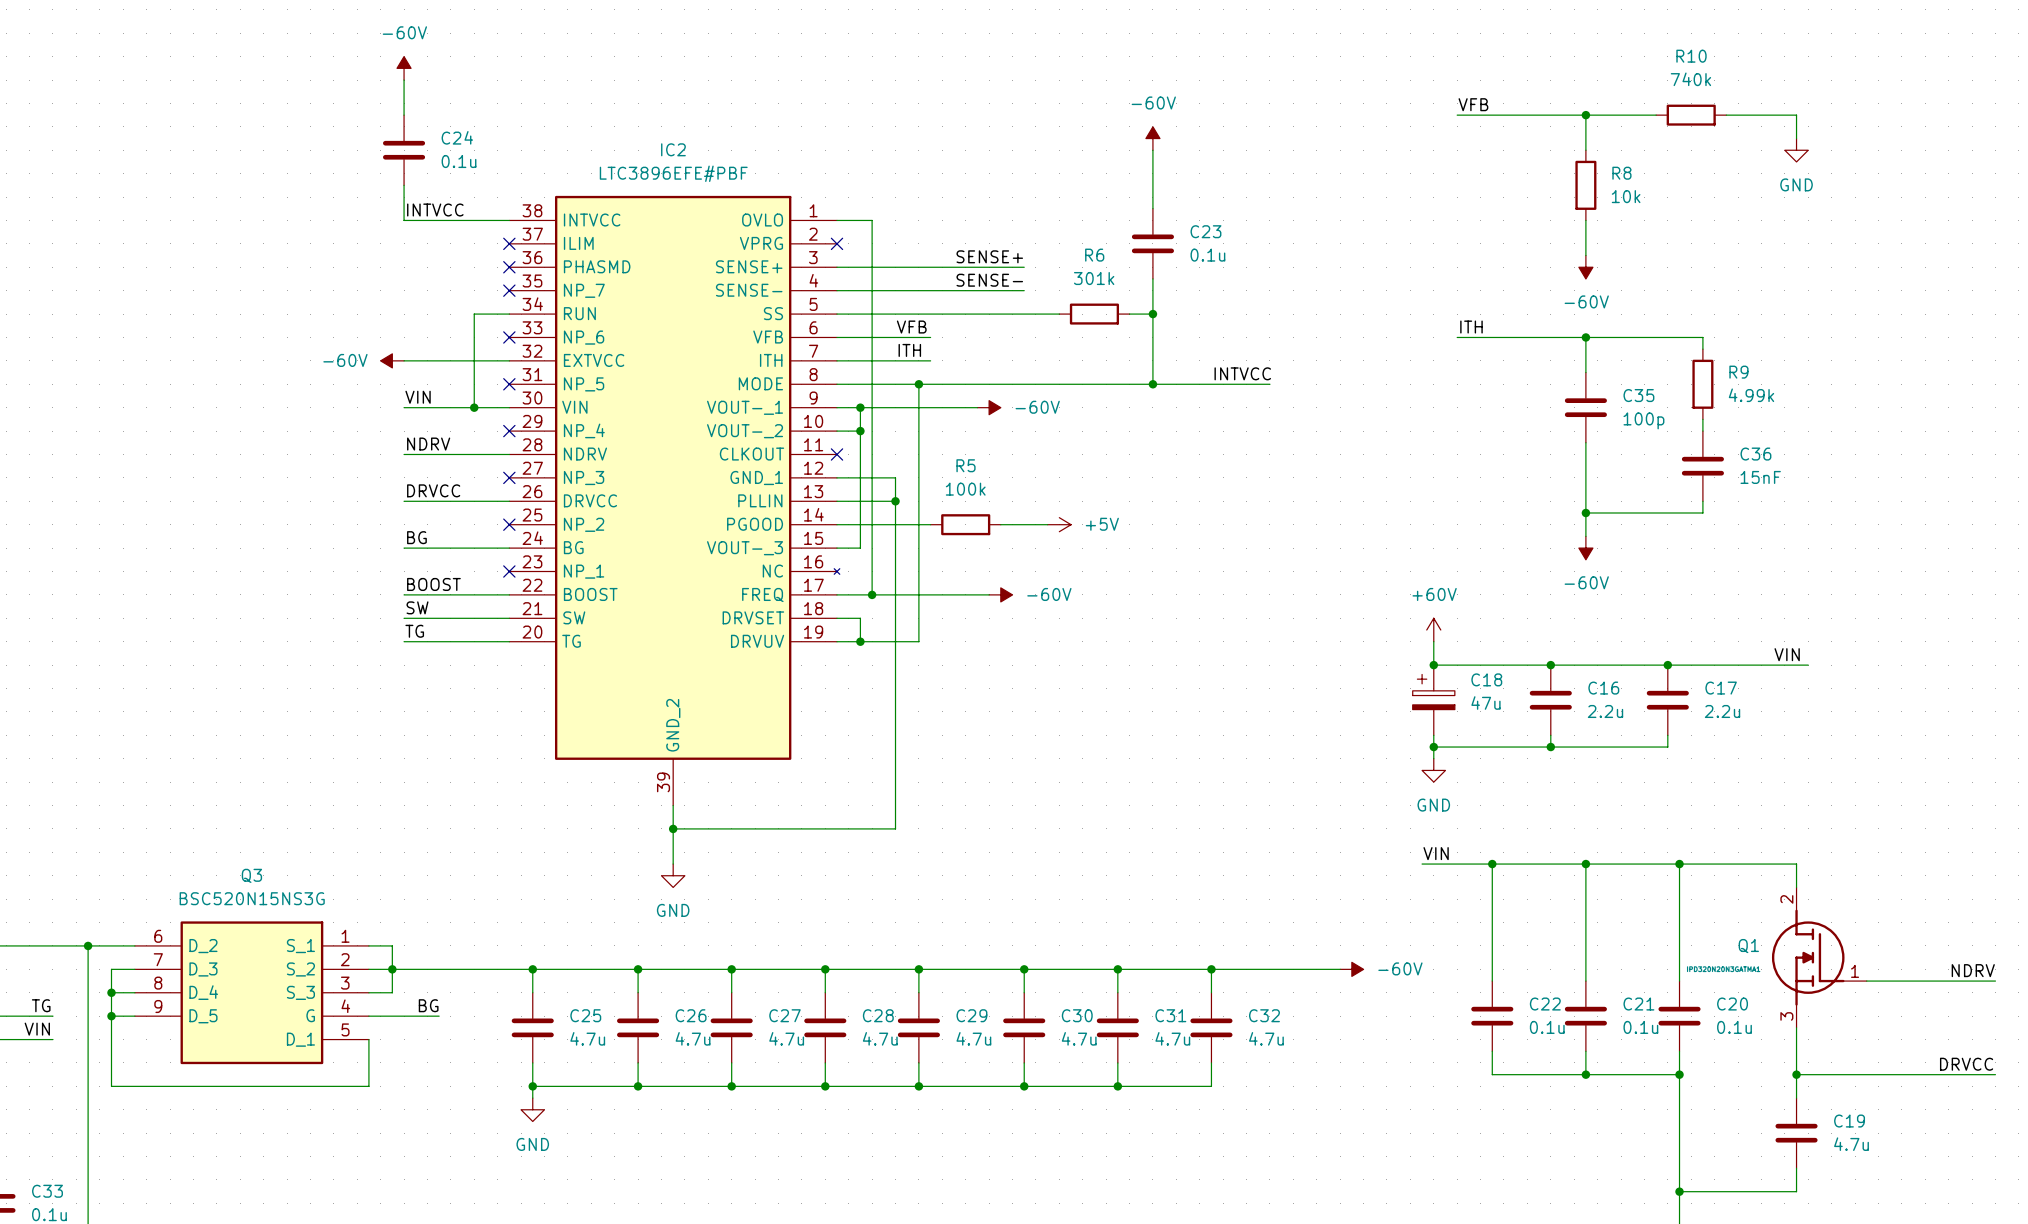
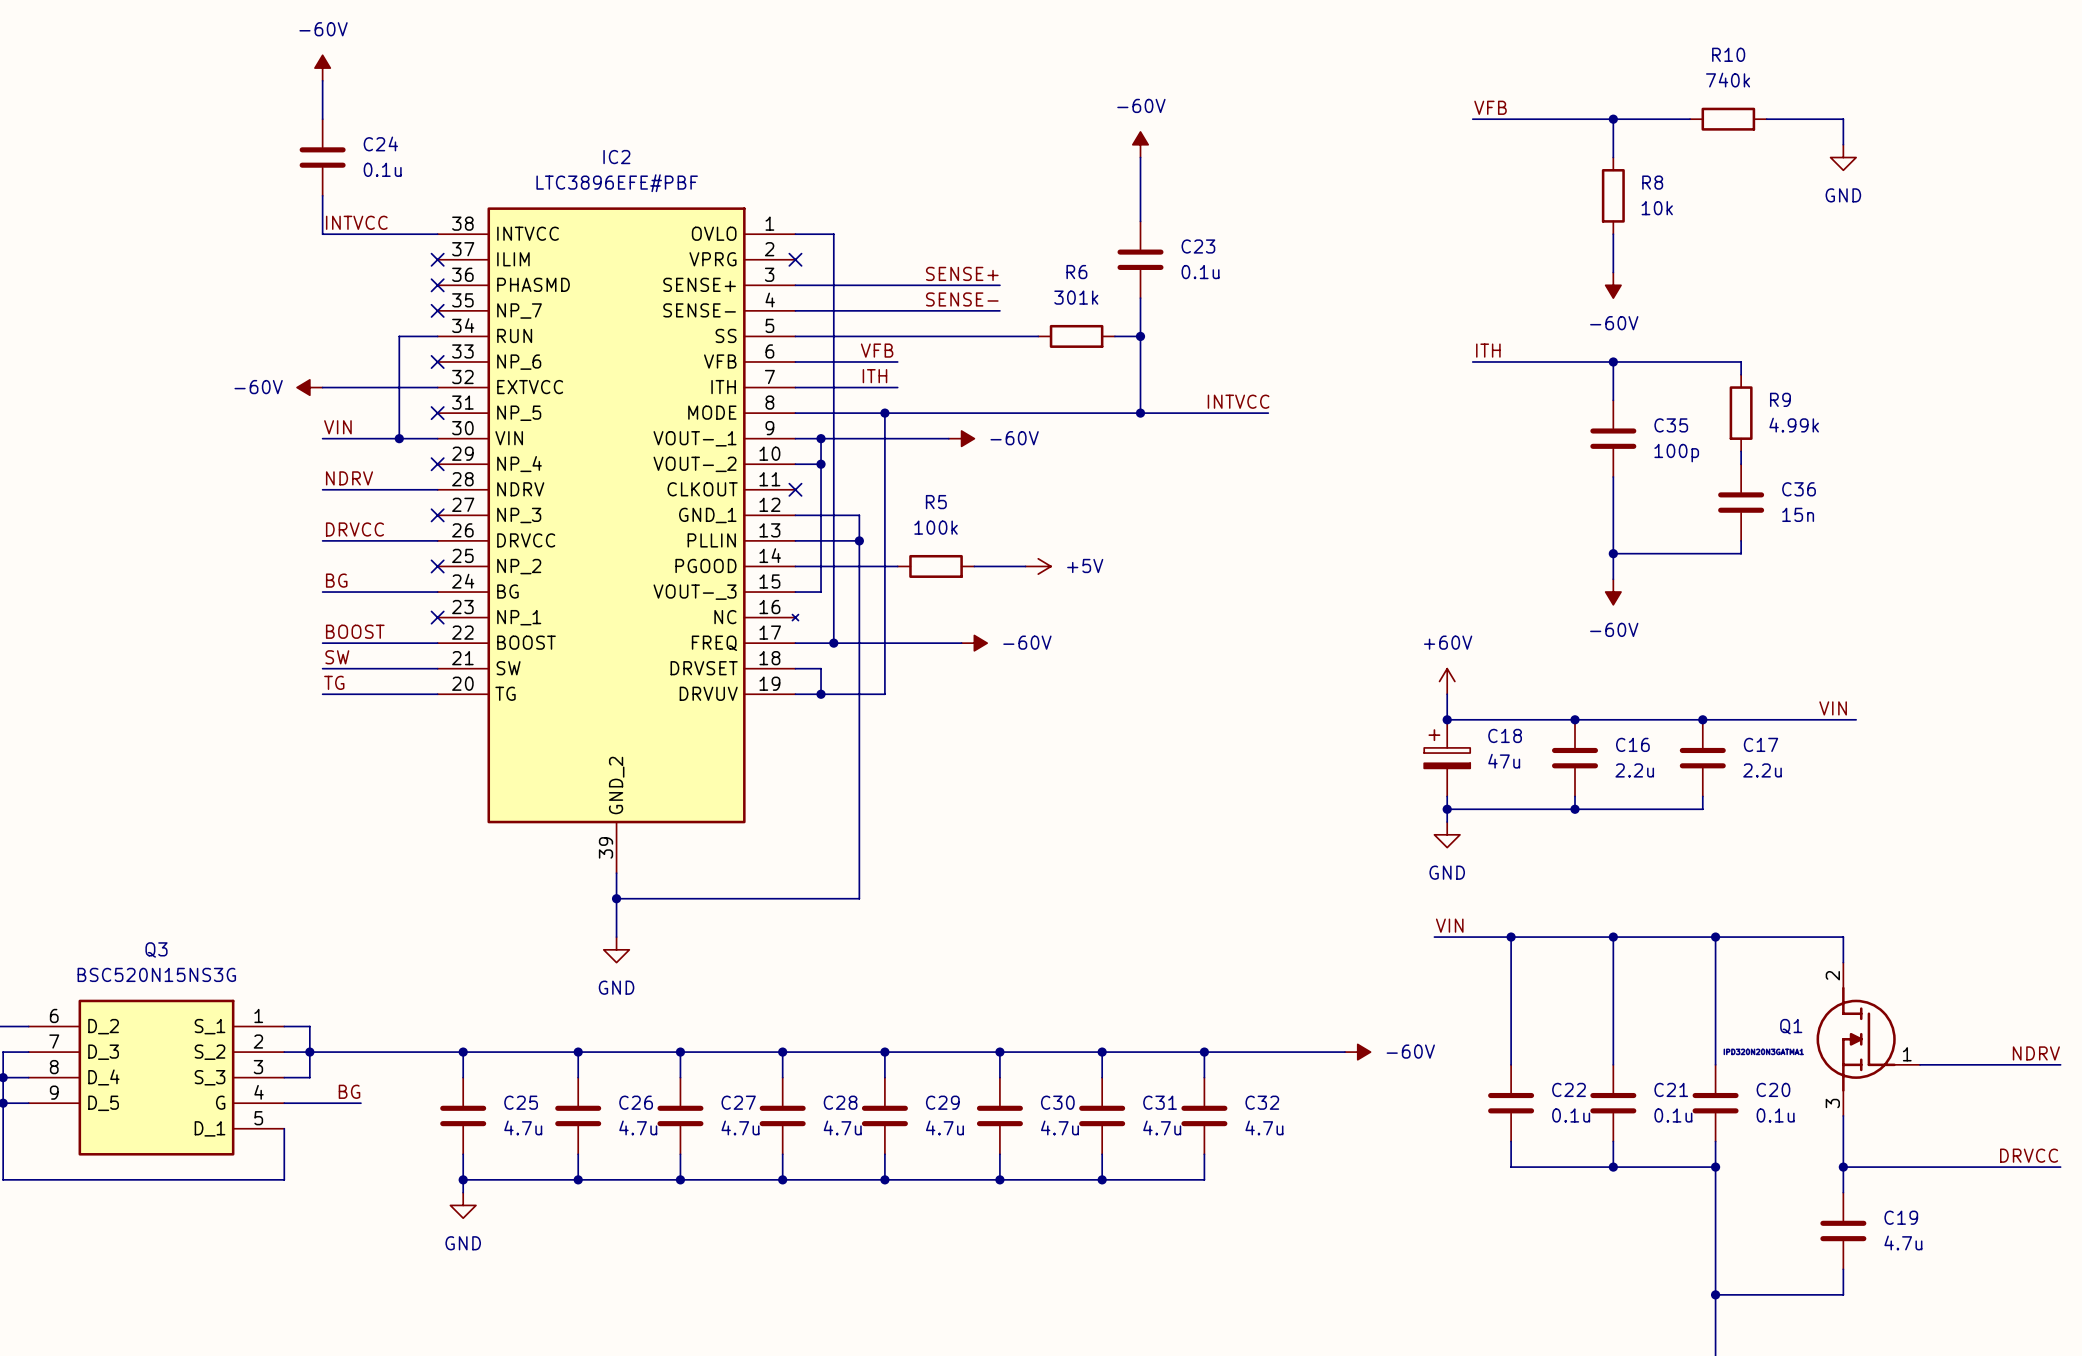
C36 value: 15nF (1760, 477) -> 15n (1798, 514)

